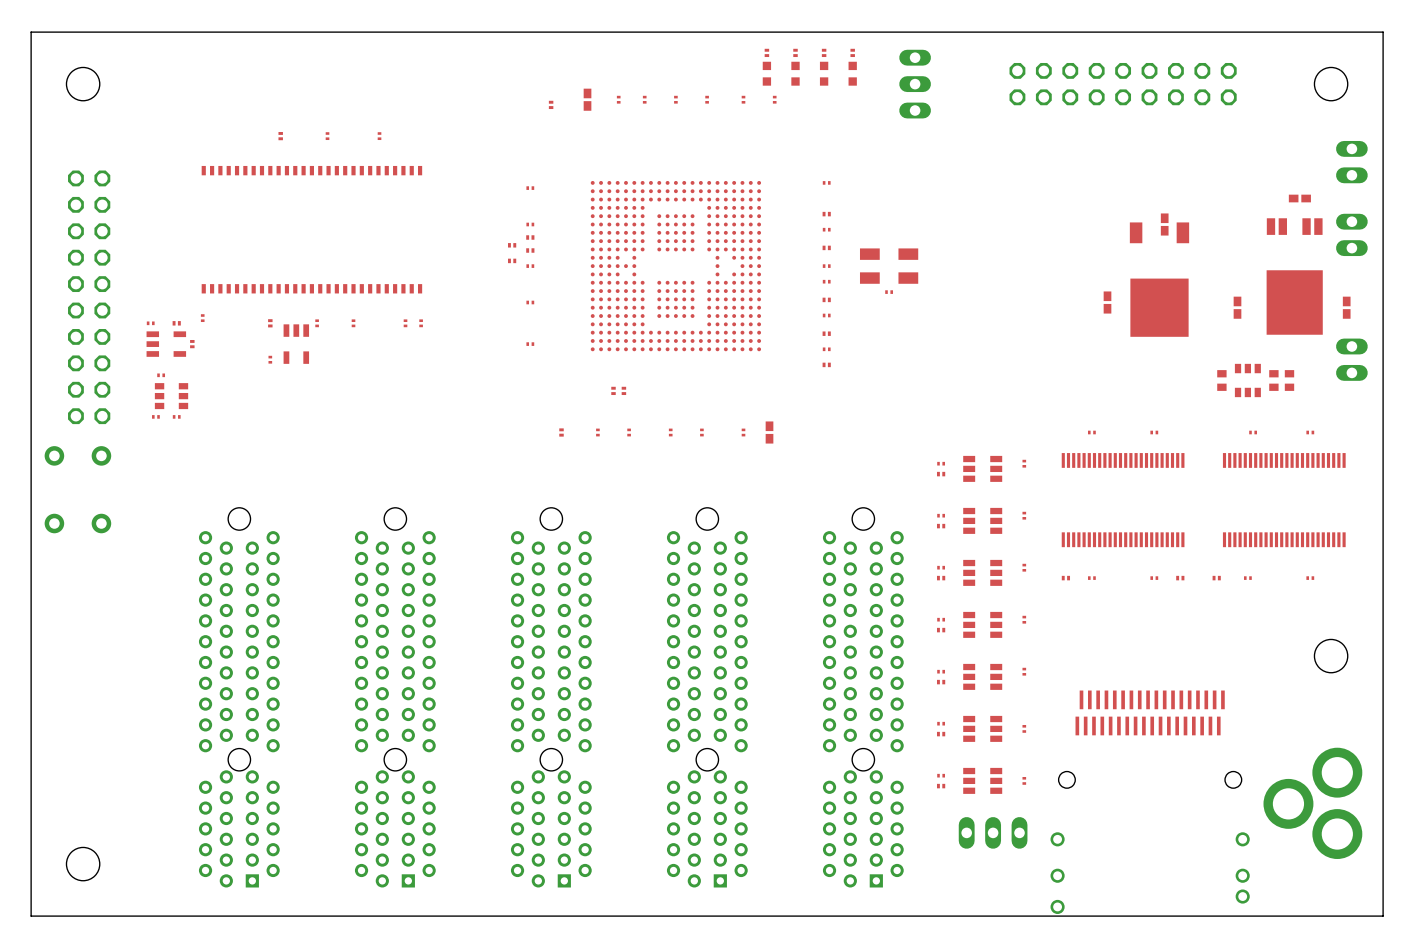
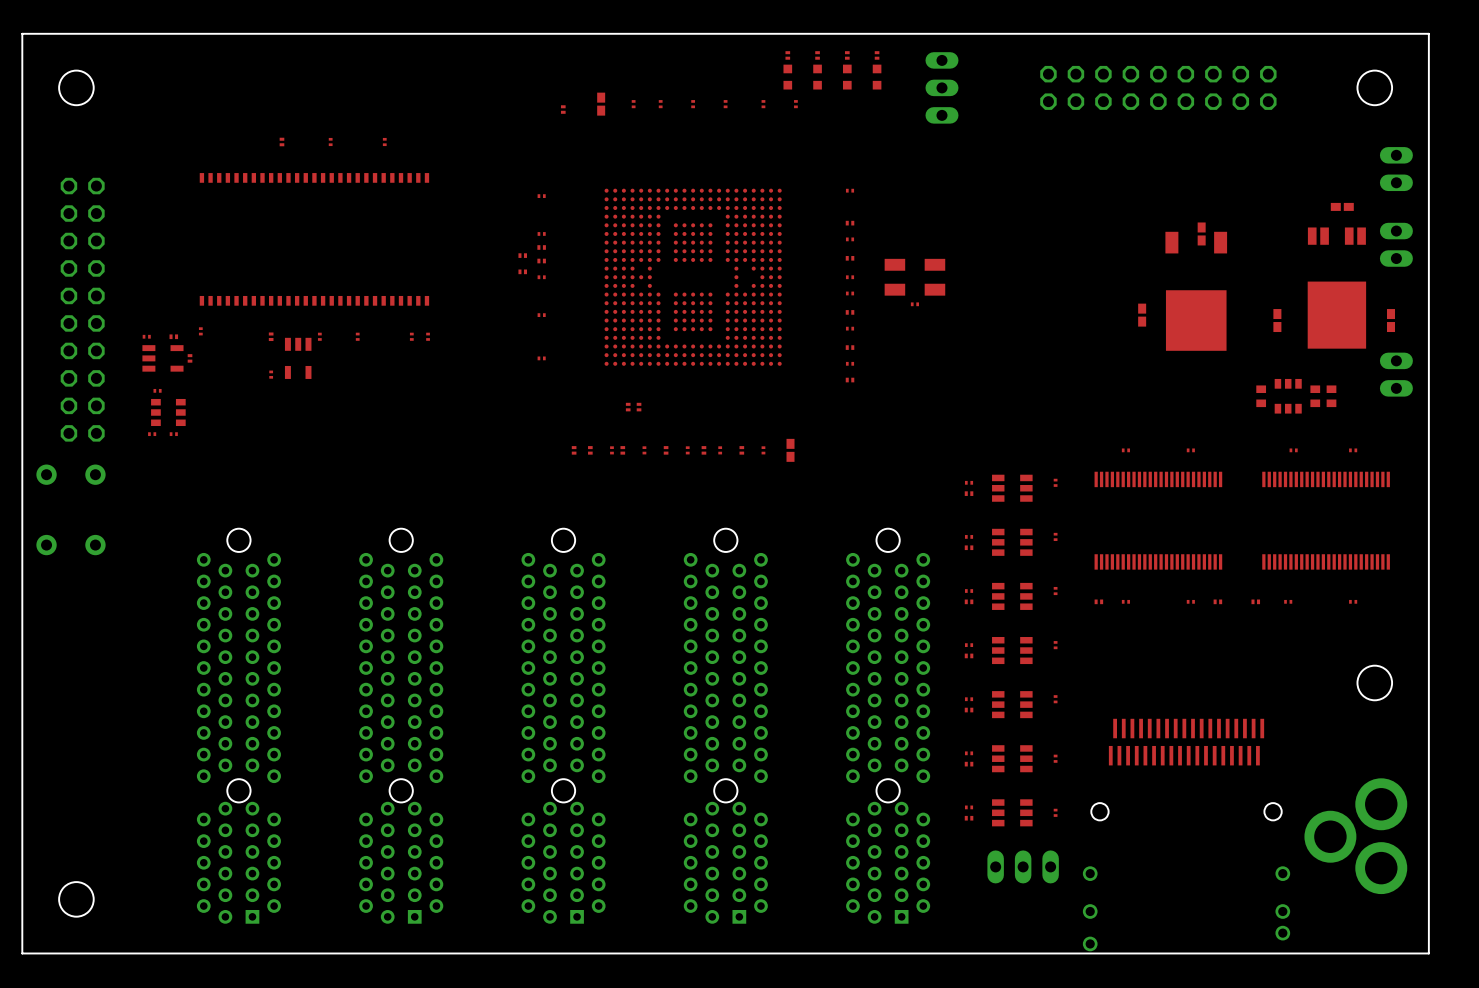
part: none -> (590, 450)
part: none -> (622, 450)
part: none -> (666, 450)
part: none -> (703, 450)
part: none -> (741, 450)

